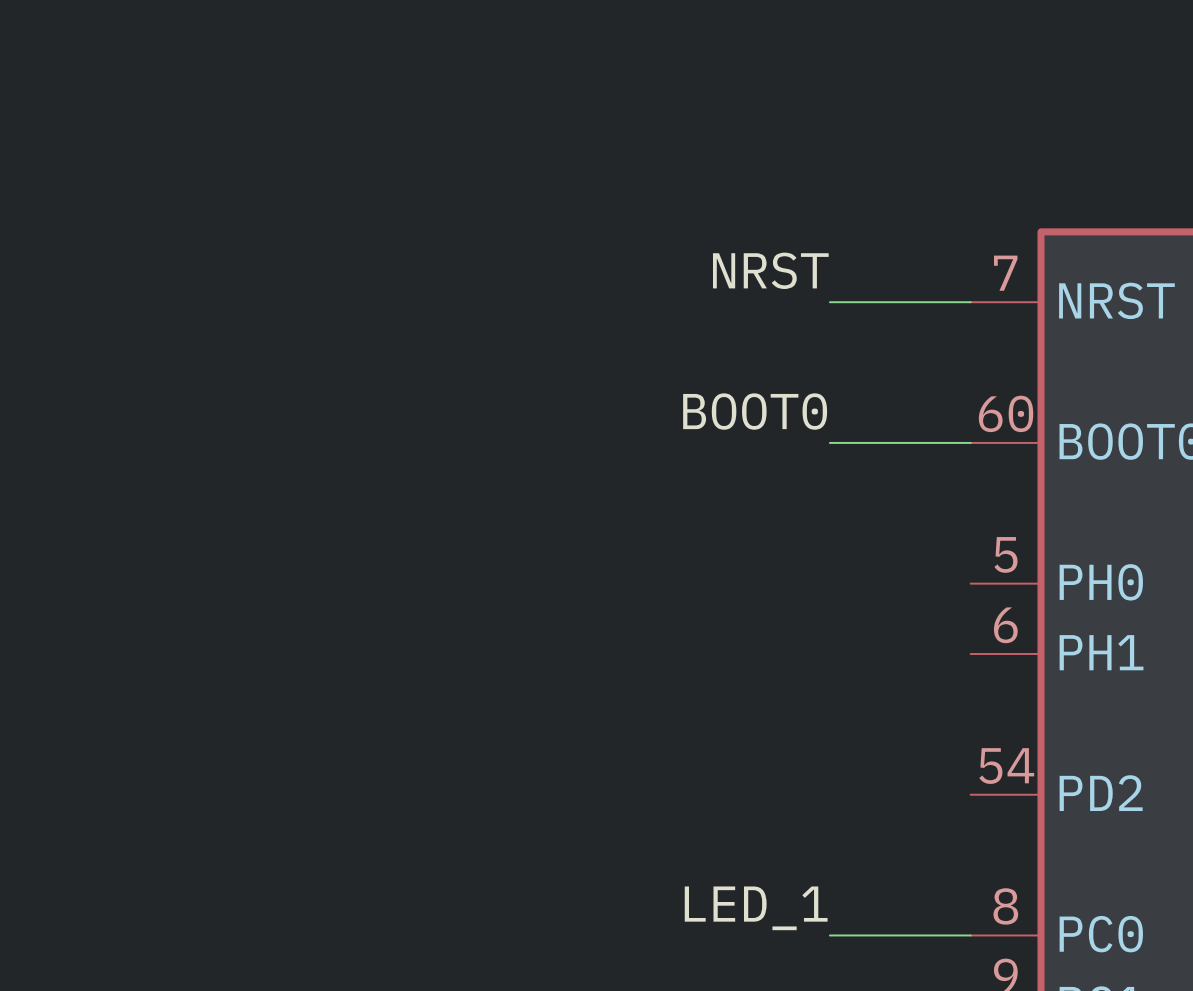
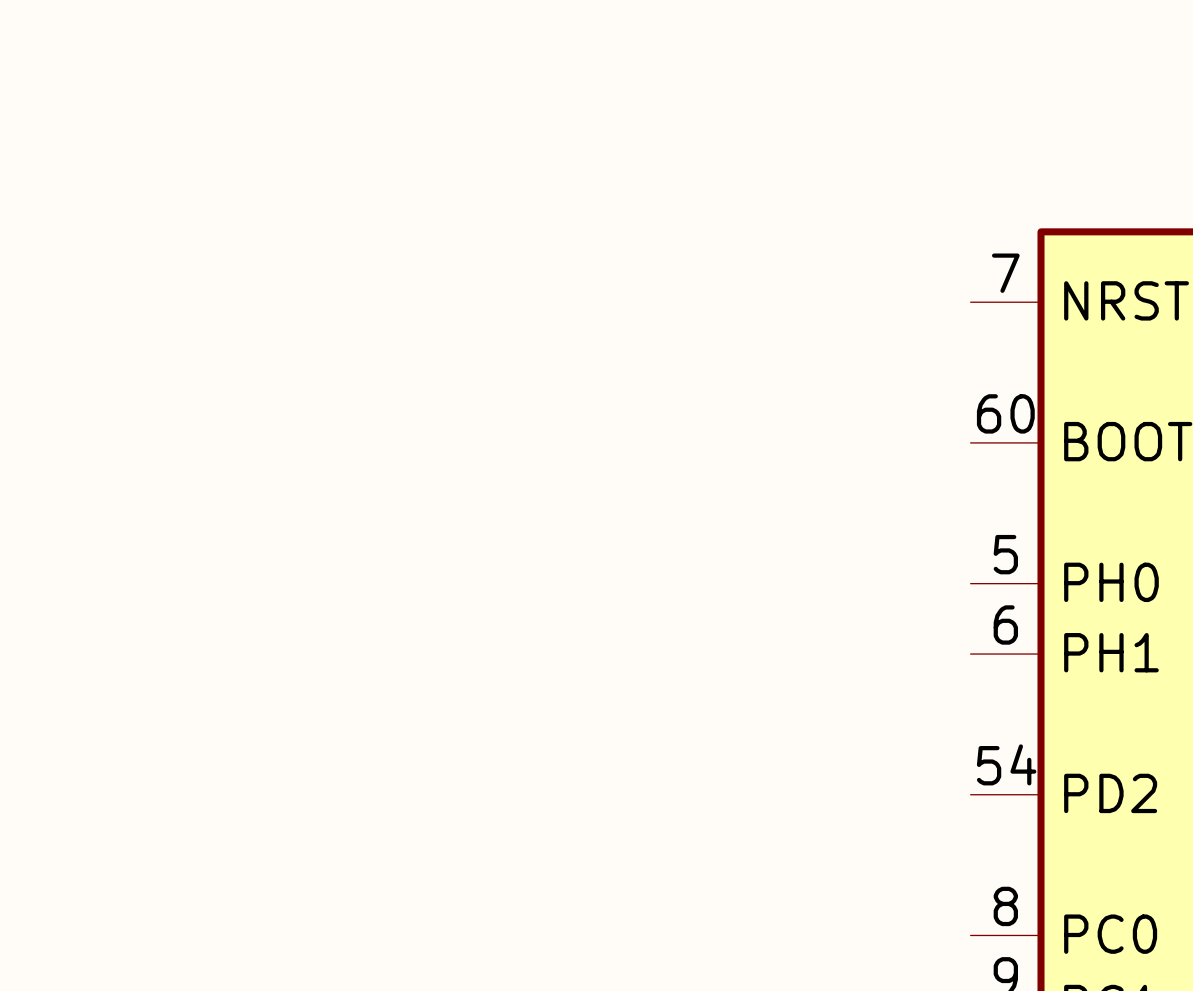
label: NRST (770, 270) -> none
wire: (829, 302) (970, 302) -> none
label: BOOT0 (755, 411) -> none
wire: (829, 442) (970, 442) -> none
label: LED_1 (756, 908) -> none
wire: (829, 935) (970, 935) -> none

